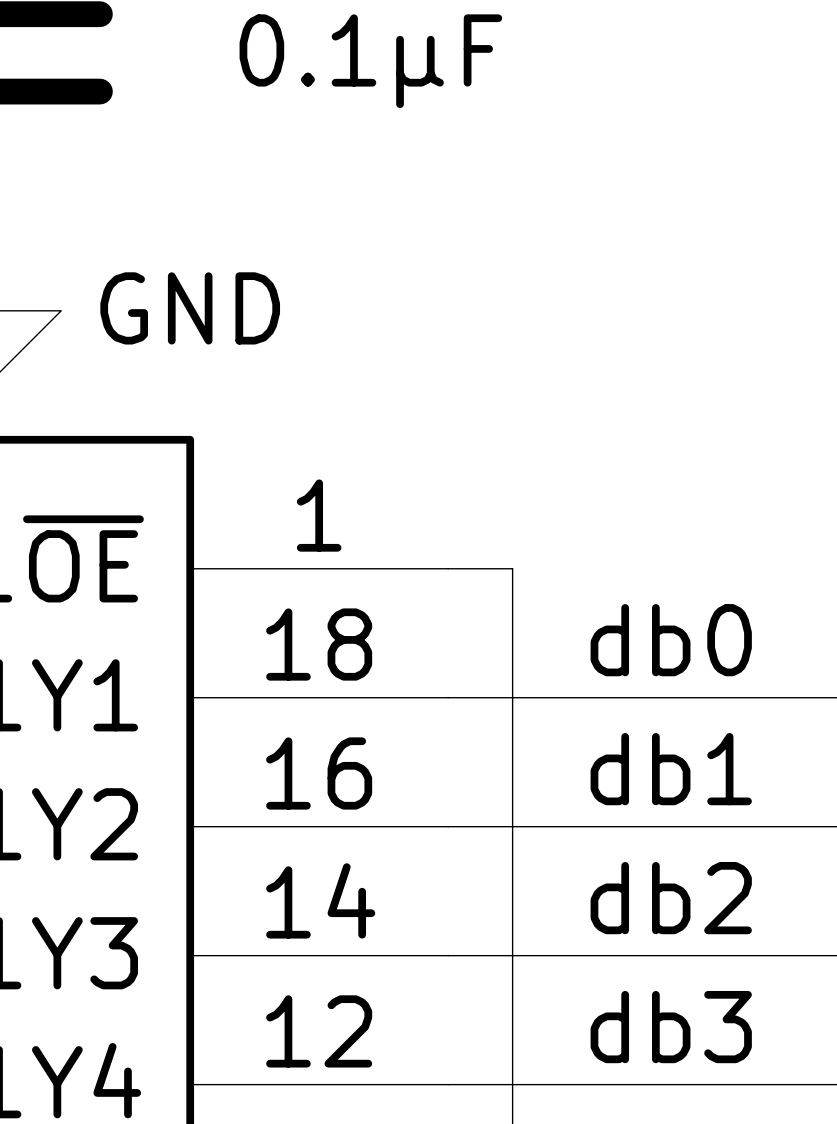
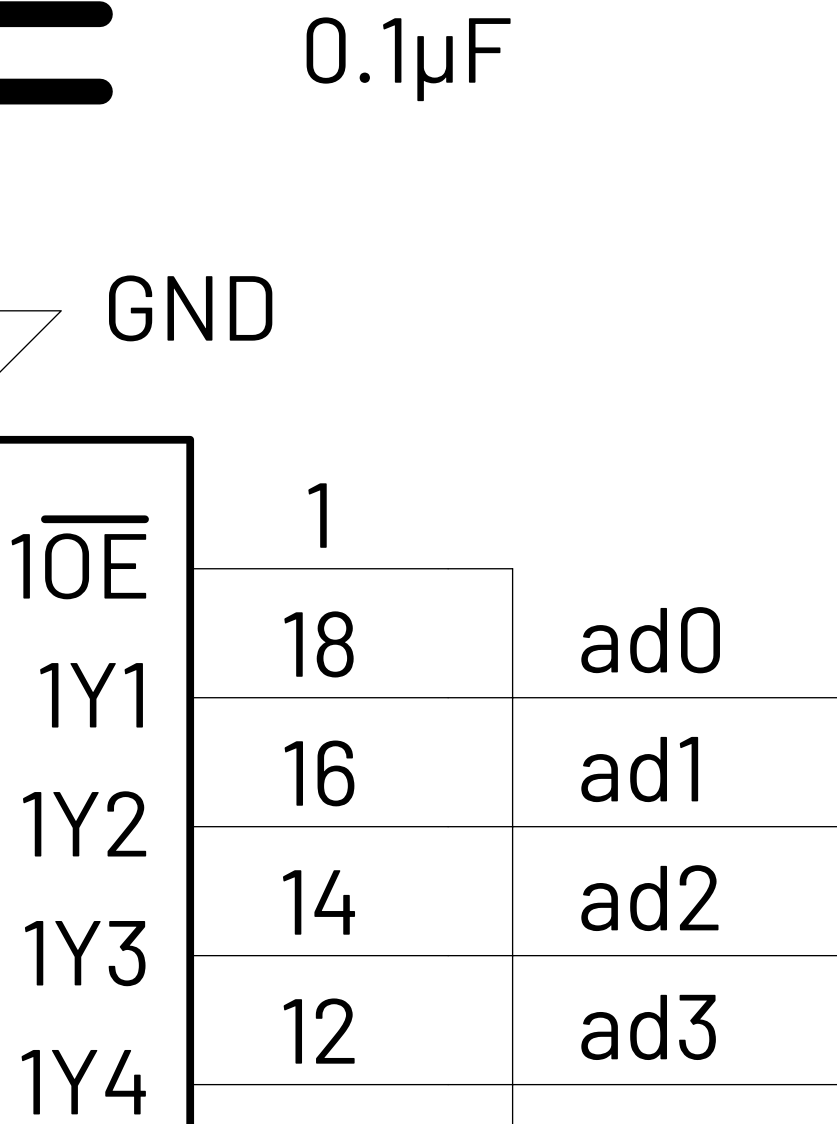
label: db0 (671, 640) -> ad0 (650, 640)
label: db1 (671, 769) -> ad1 (639, 769)
label: db2 (671, 898) -> ad2 (649, 898)
label: db3 (671, 1027) -> ad3 (648, 1027)

